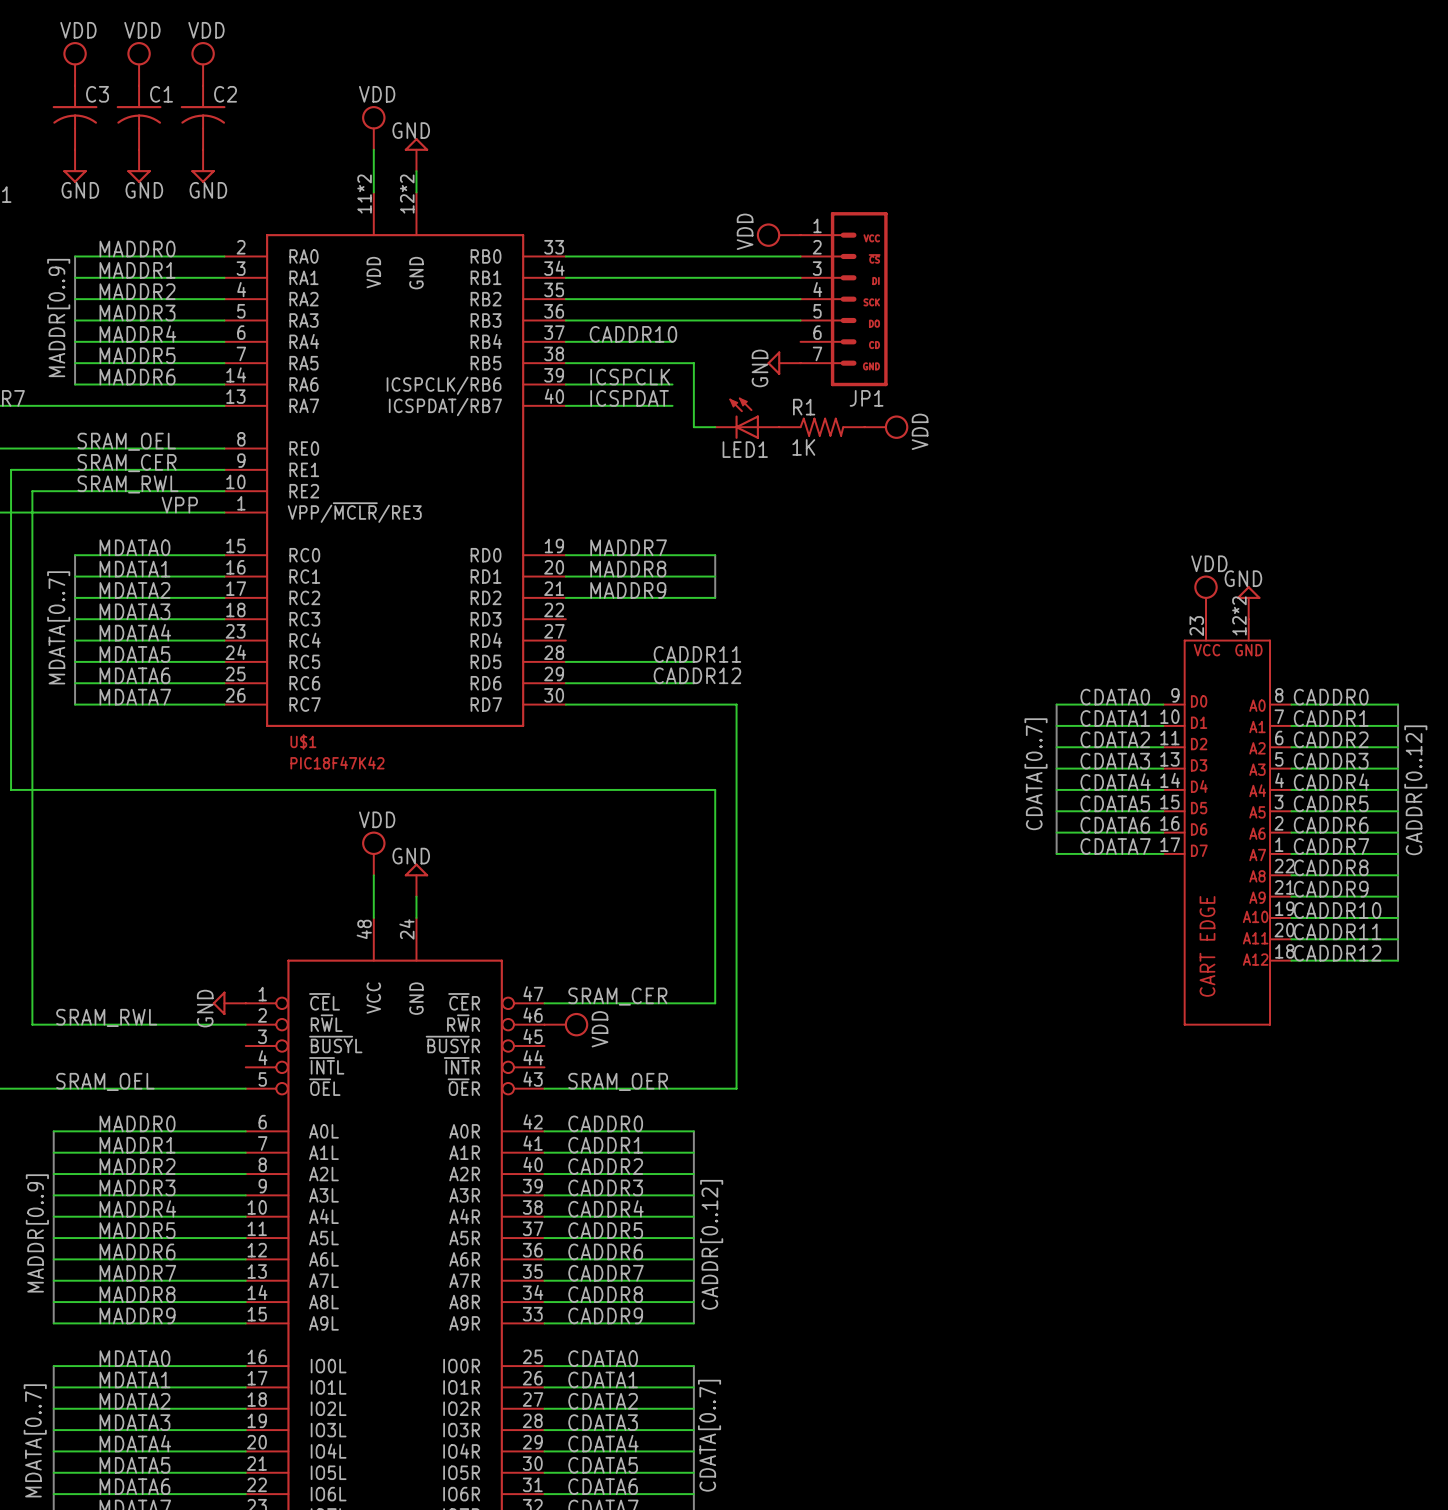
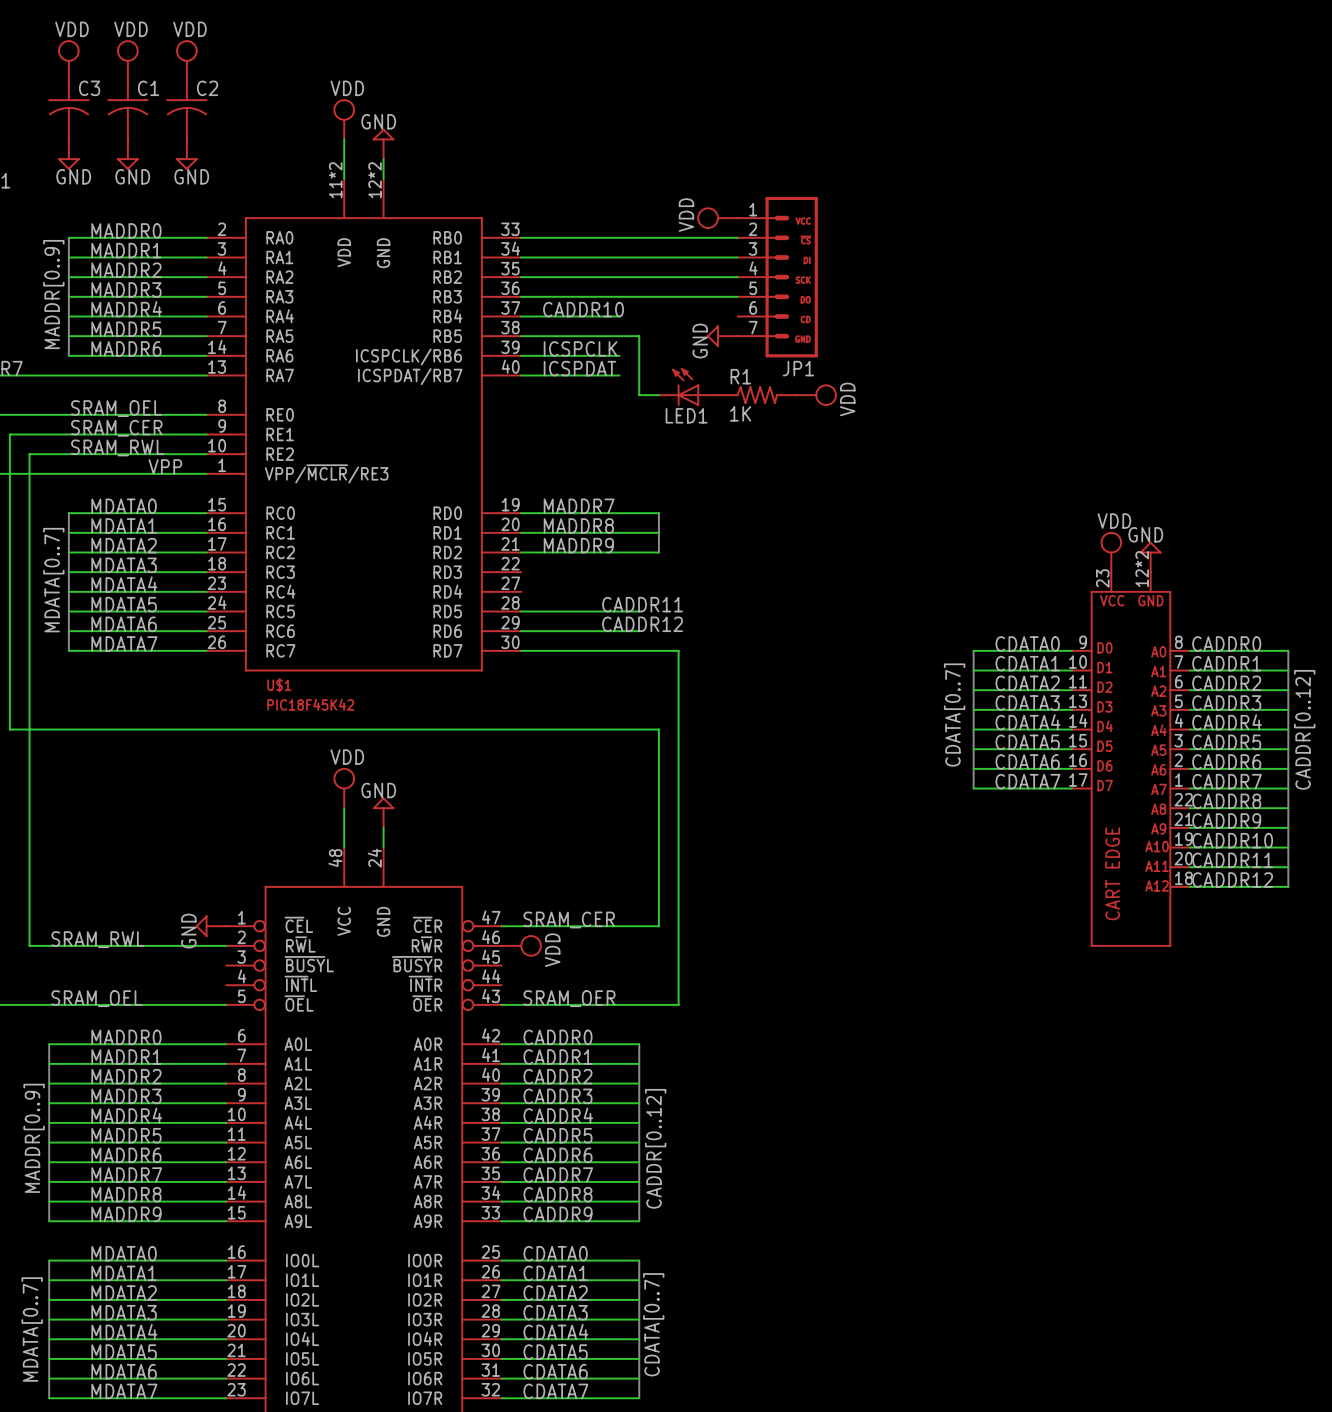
U$1 text: PIC18F47K42 (337, 763) -> PIC18F45K42 (310, 704)

